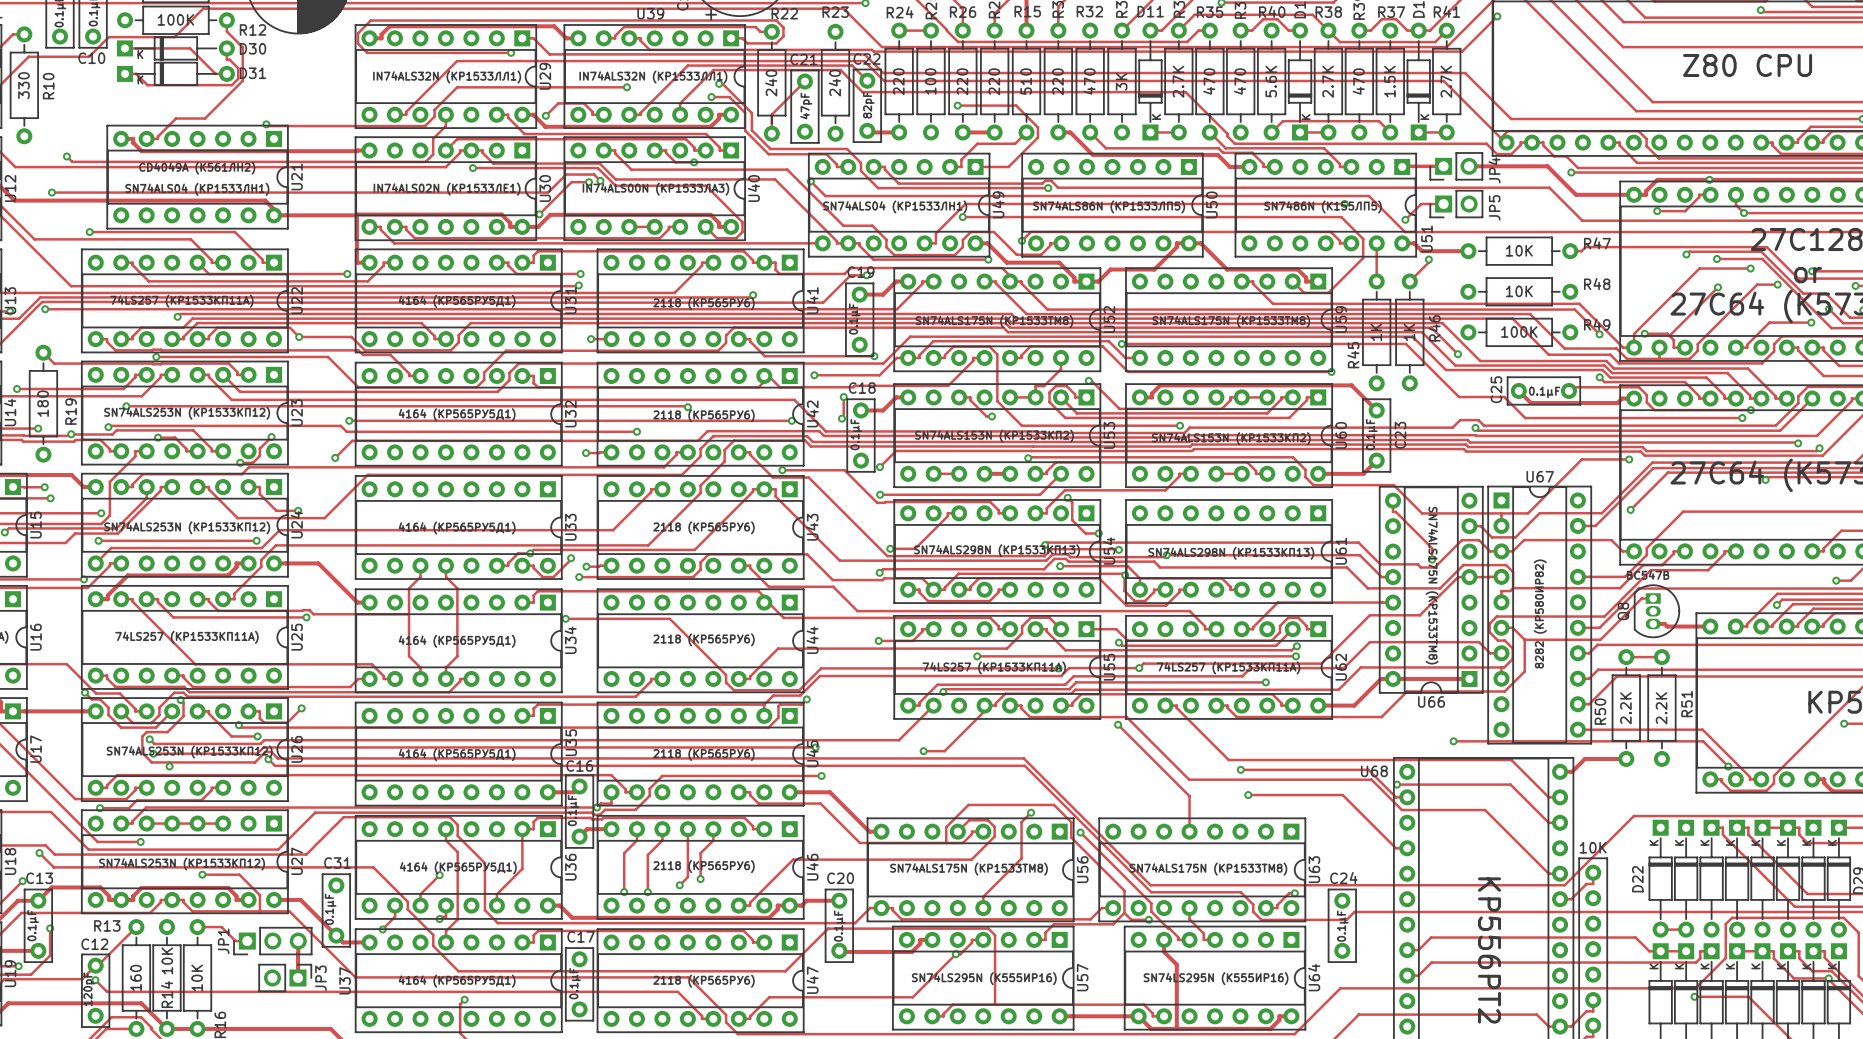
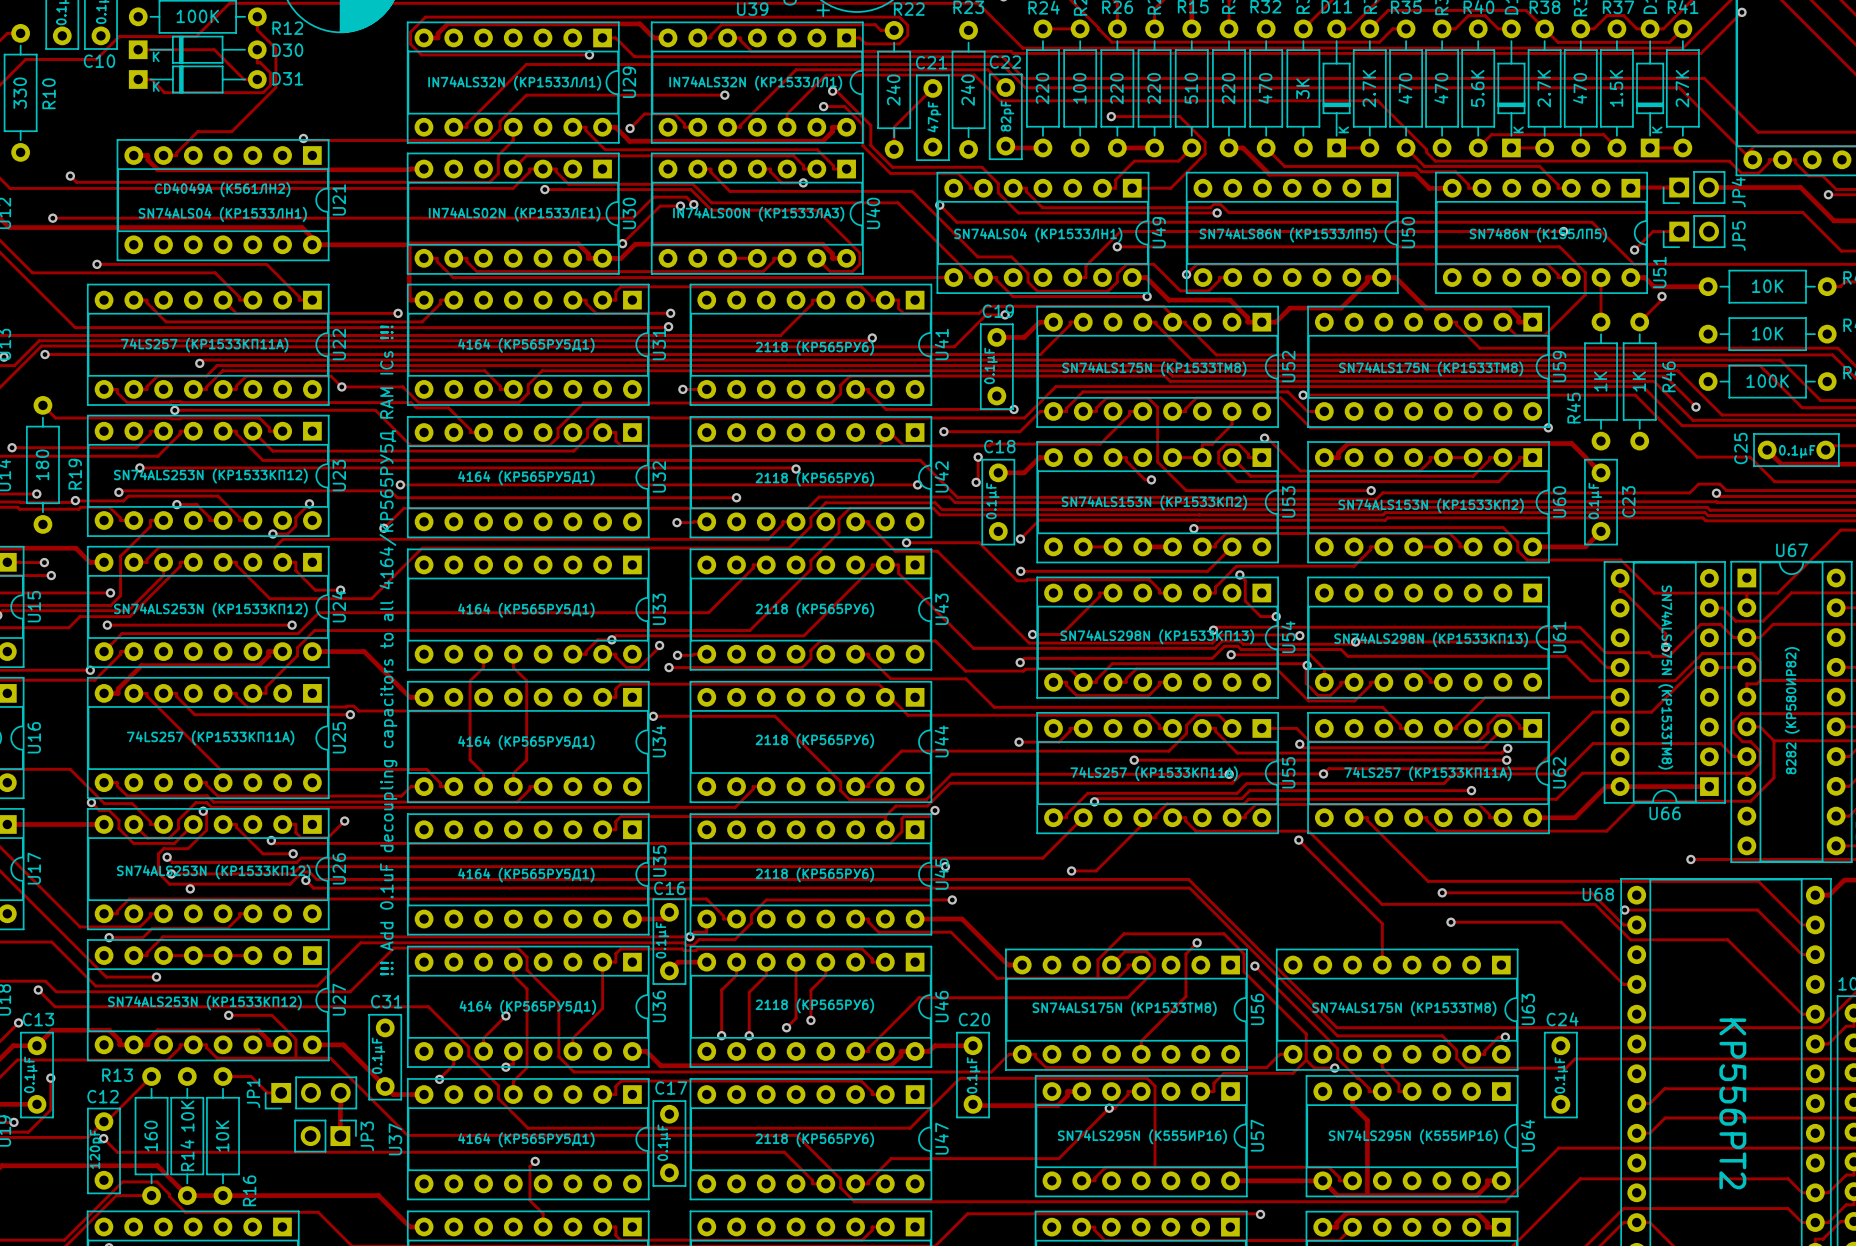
text: none -> !!! Add 0.1uF decoupling capacitors to all 4164/КР565РУ5Д RAM ICs !!! (388, 650)

